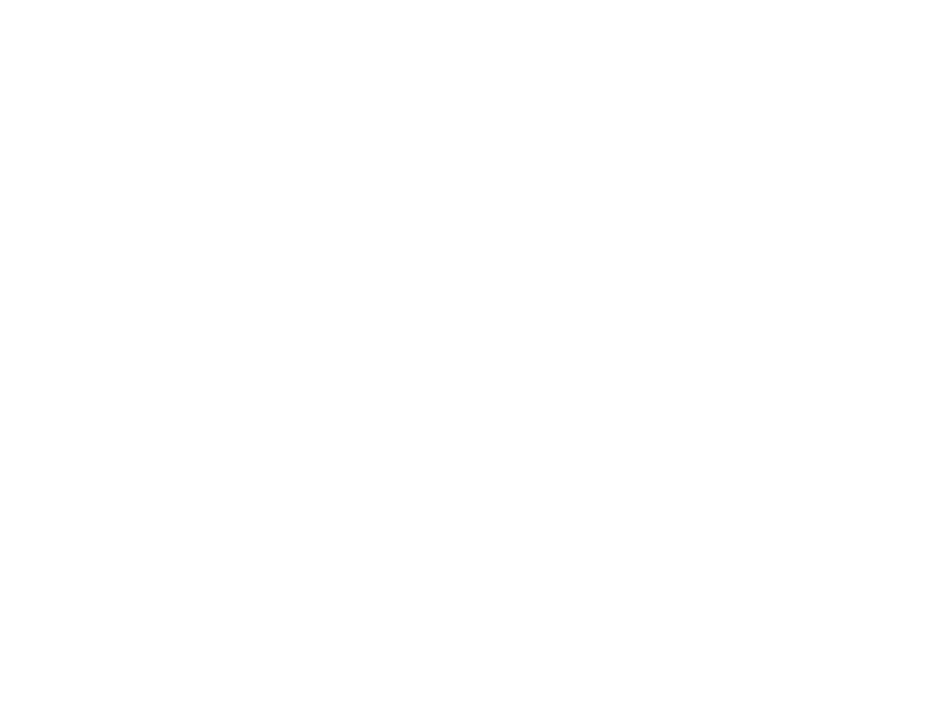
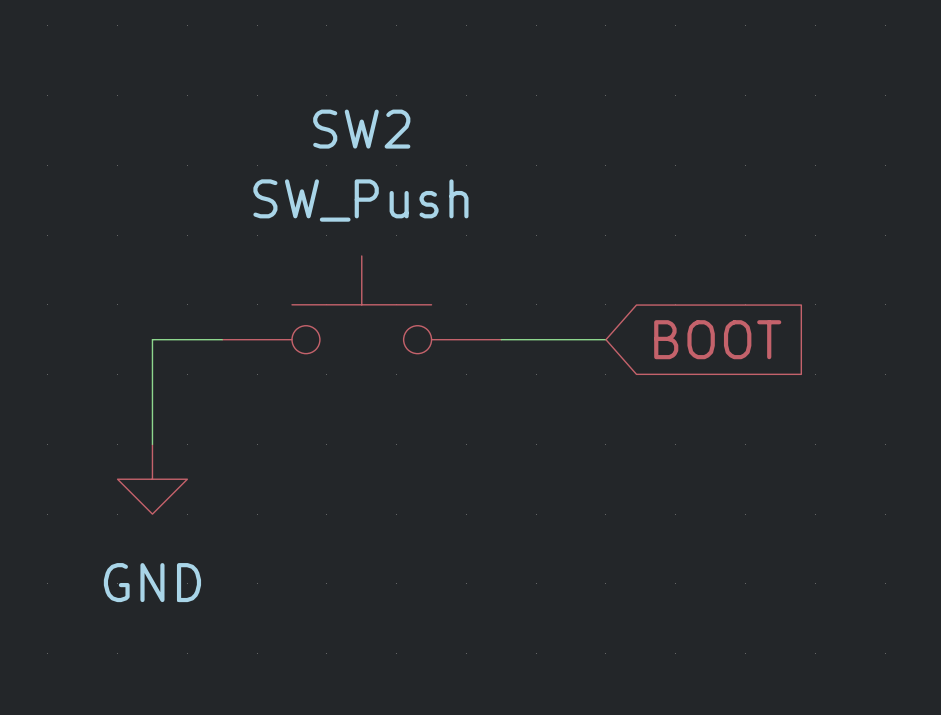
SW2: none -> SW_Push (361, 304)
wire: none -> (222, 339) (152, 339) (152, 444)
wire: none -> (501, 339) (605, 339)
global label: none -> BOOT (717, 339)
power symbol: none -> GND (152, 479)

